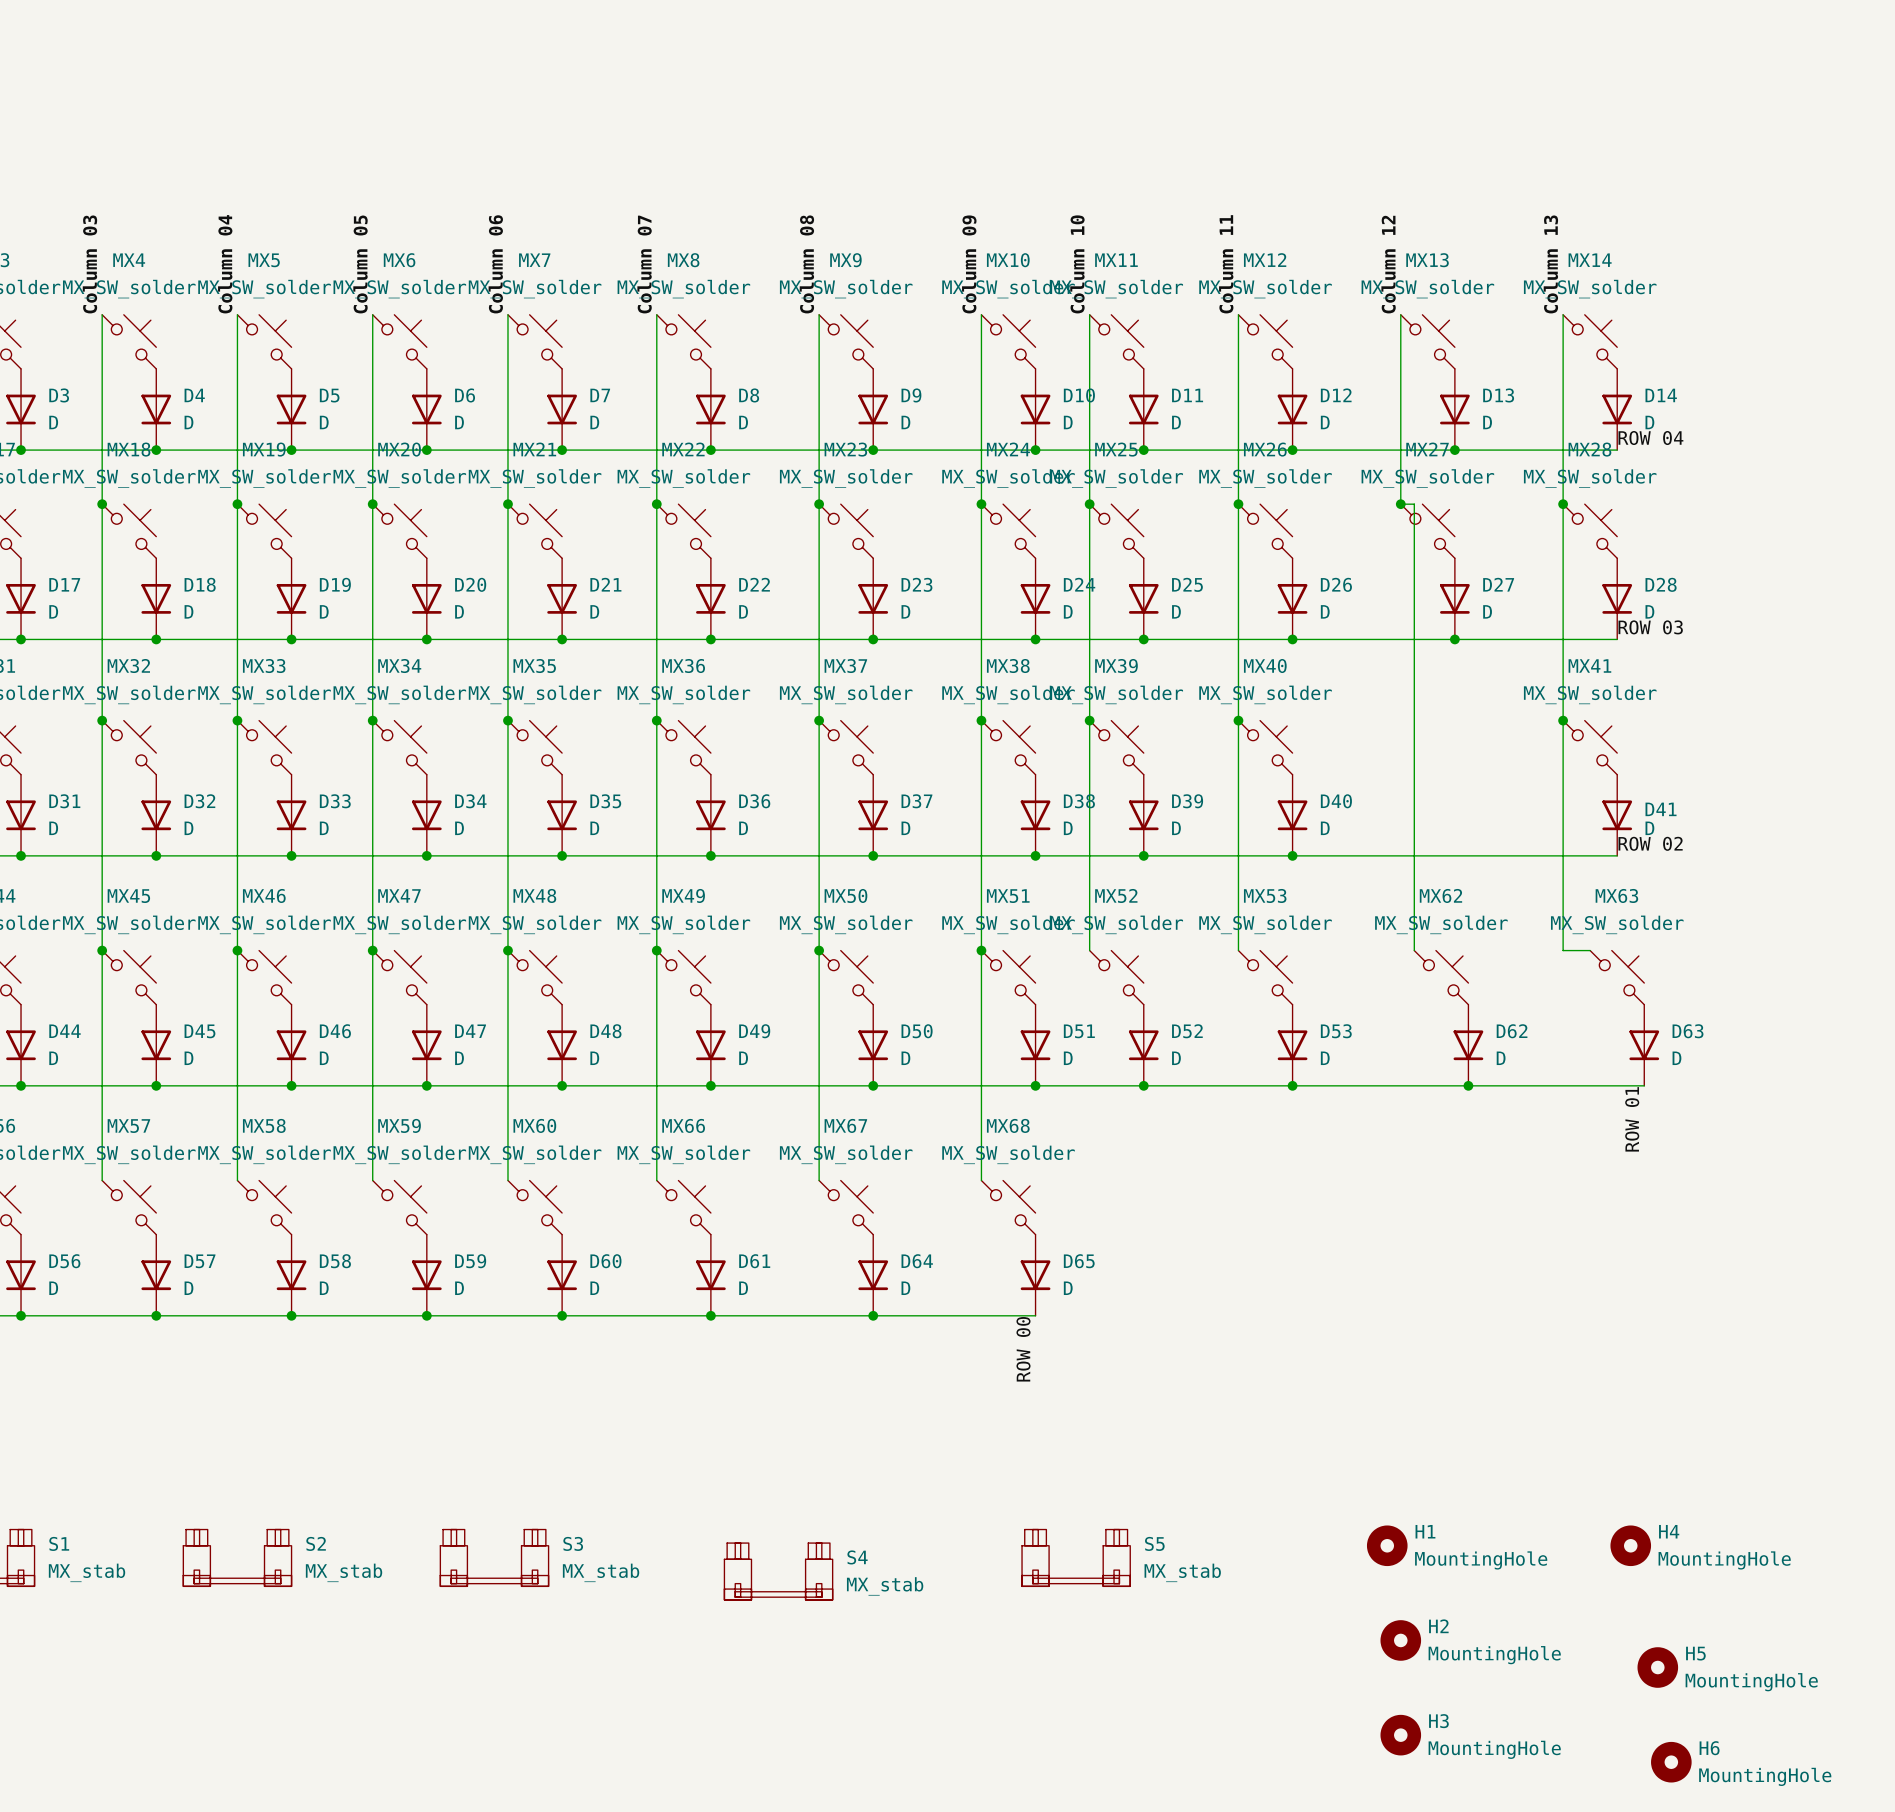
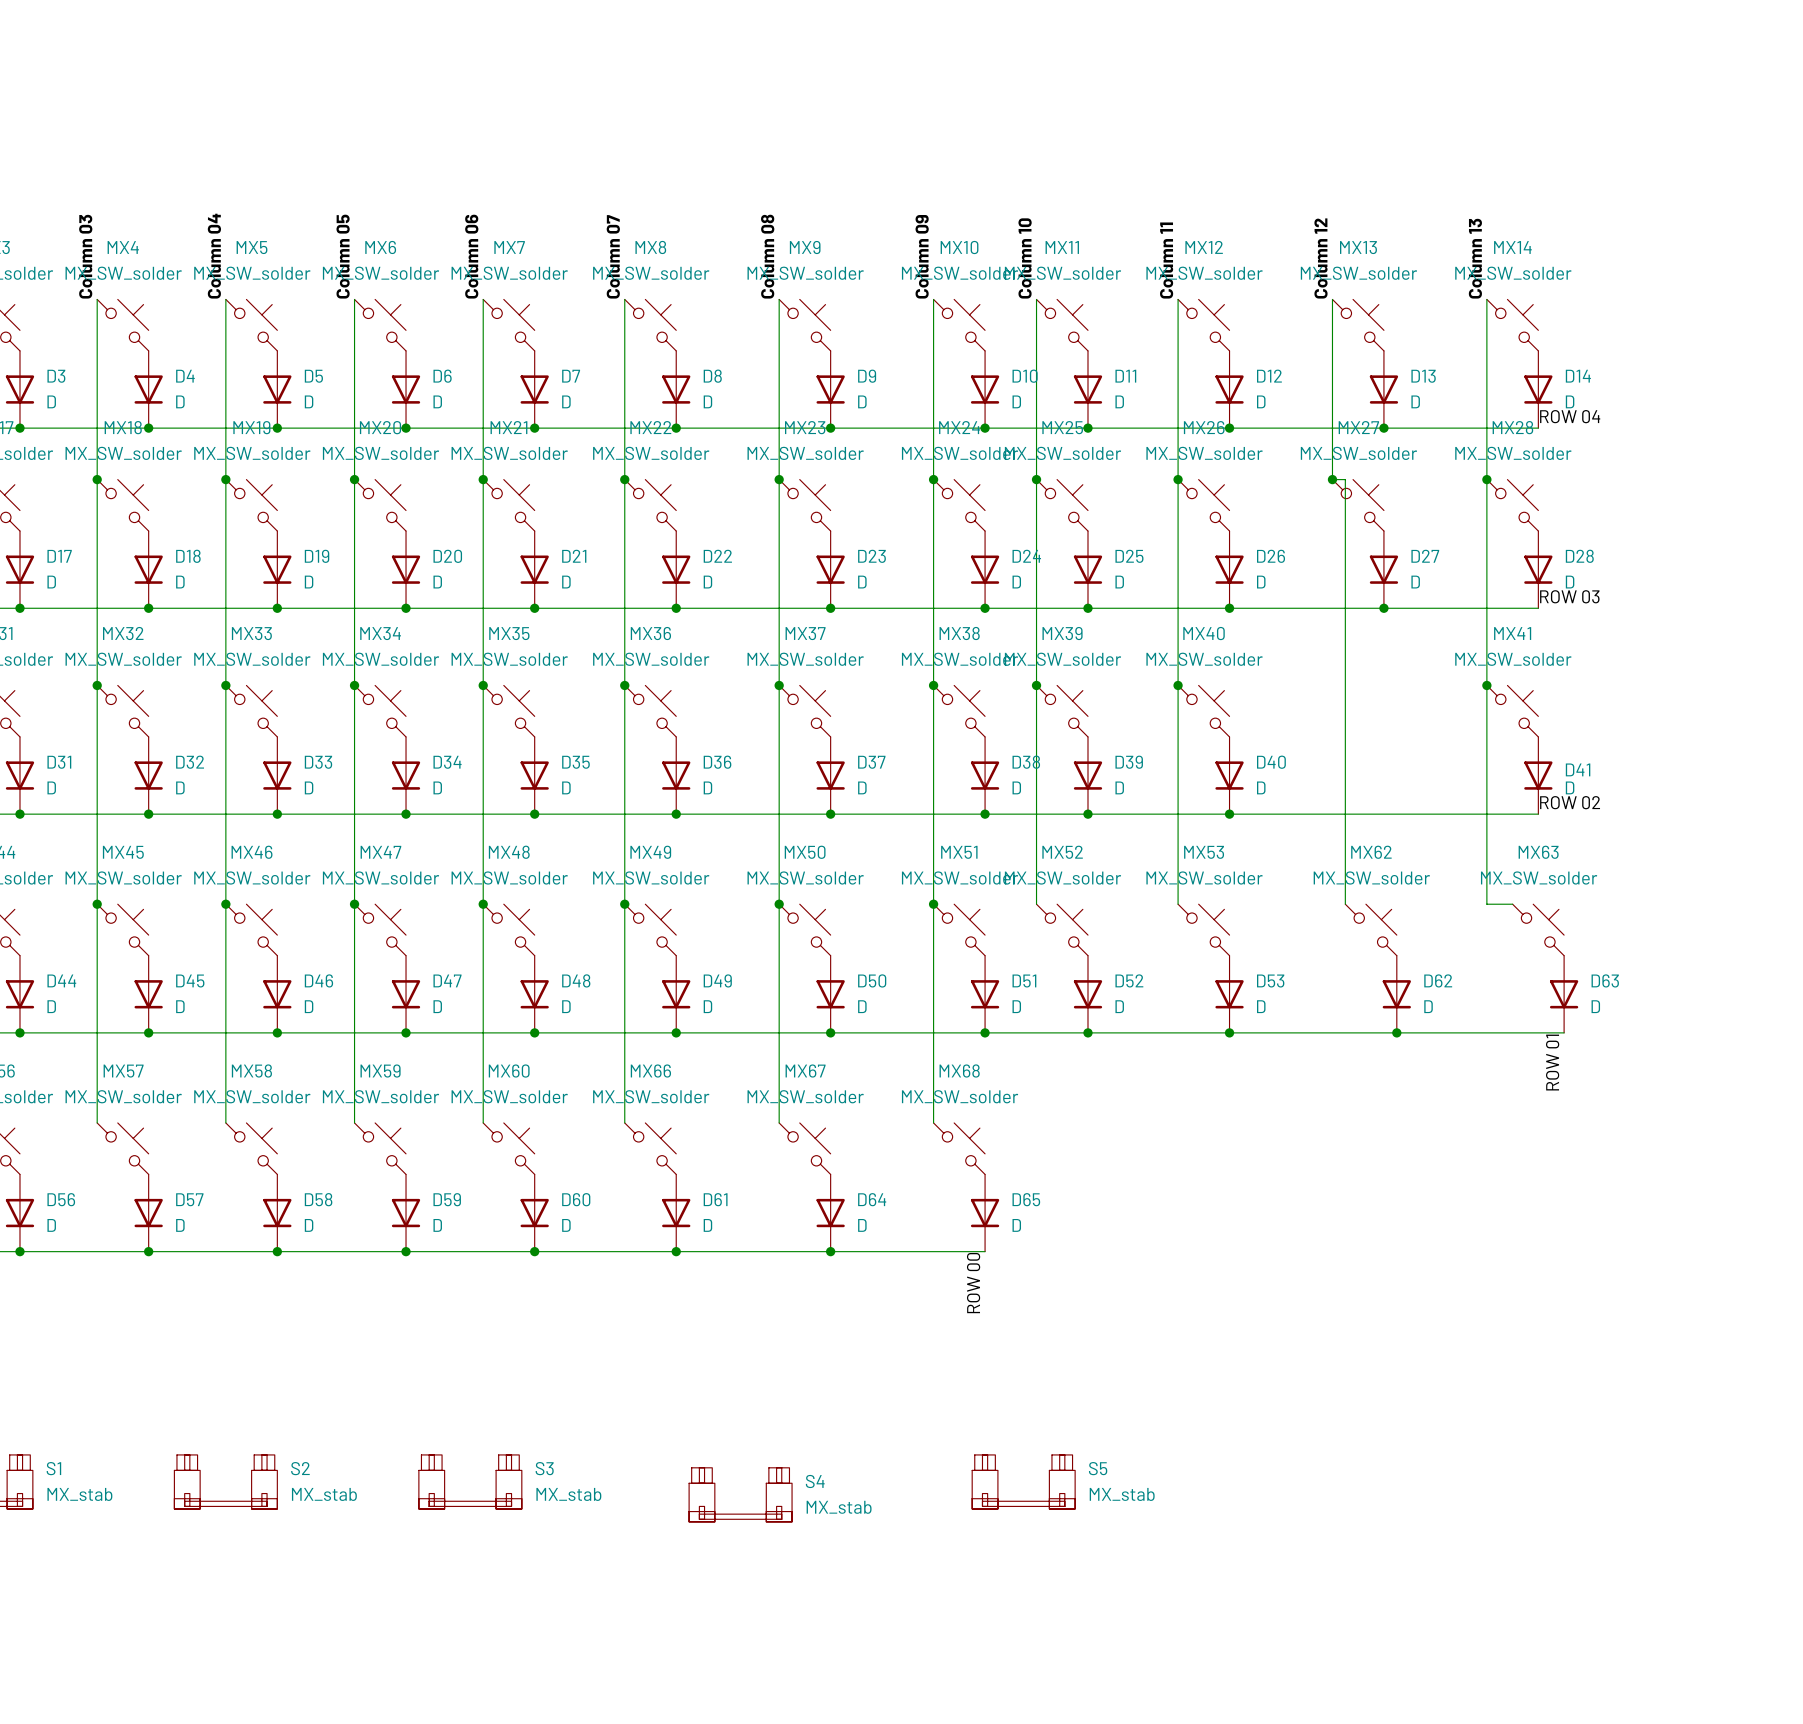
H1: MountingHole (1387, 1545) -> none
H4: MountingHole (1630, 1545) -> none
H2: MountingHole (1400, 1640) -> none
H5: MountingHole (1657, 1667) -> none
H3: MountingHole (1400, 1735) -> none
H6: MountingHole (1671, 1762) -> none

